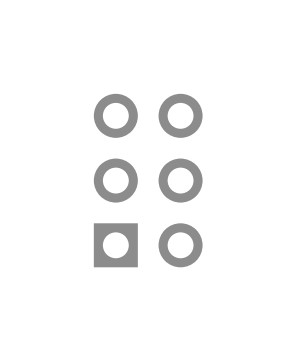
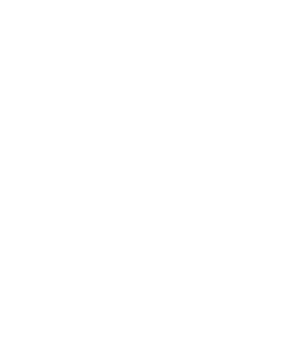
part: (148, 180) -> none

